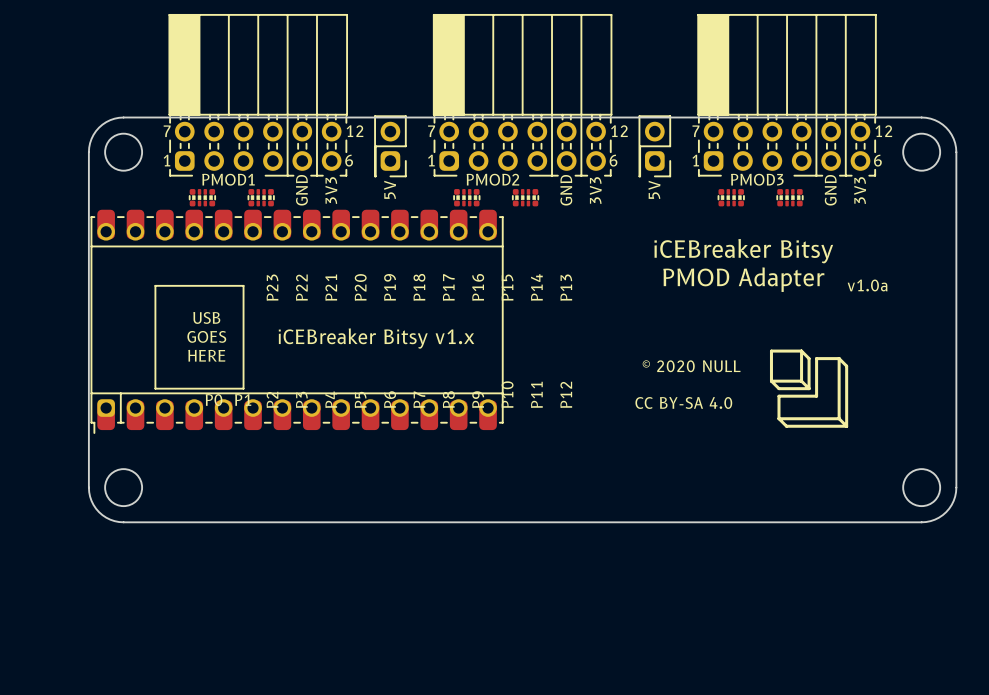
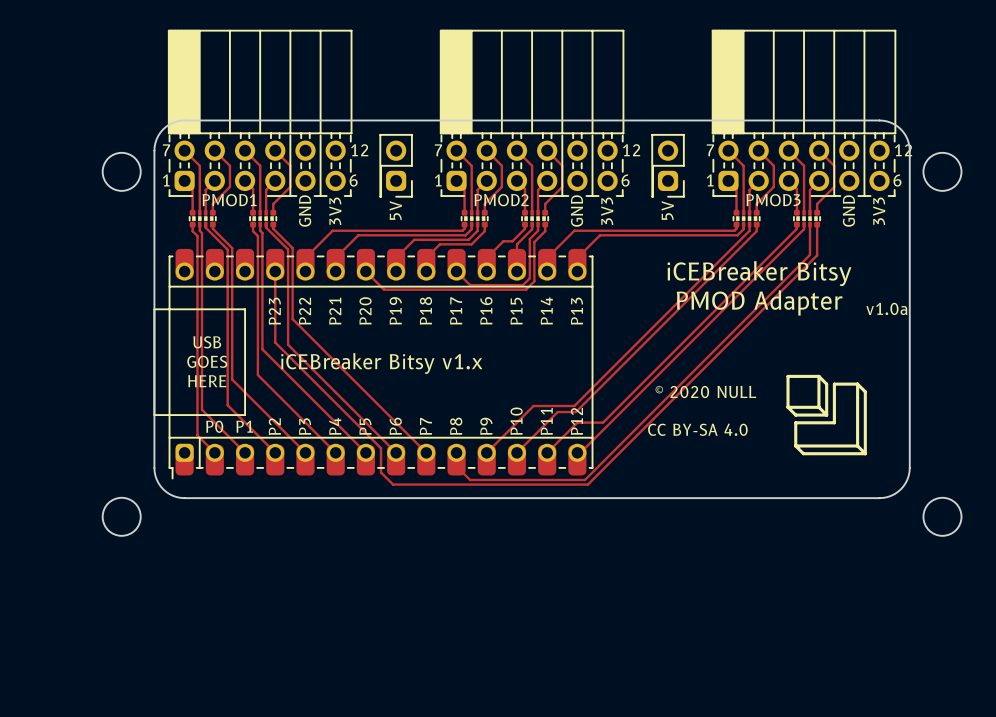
board edge: (123, 117) (921, 117) (934, 120) (949, 131) (955, 143) (956, 152) (956, 487) (953, 500) (942, 515) (930, 521) (921, 522) (123, 522) (110, 519) (96, 508) (90, 496) (88, 487) (88, 152) (91, 138) (99, 127) (110, 120) (123, 117) -> (184, 120) (173, 122) (163, 129) (156, 139) (154, 150) (154, 467) (158, 483) (169, 494) (184, 498) (879, 498) (894, 494) (905, 483) (909, 467) (909, 150) (905, 135) (894, 124) (879, 120) (184, 120)
track: none -> (184, 150) (199, 165) (199, 212)
track: none -> (214, 150) (229, 165) (229, 186) (212, 204) (212, 212)
track: none -> (245, 150) (260, 165) (260, 212)
track: none -> (275, 150) (290, 165) (290, 186) (273, 204) (273, 212)
track: none -> (456, 150) (471, 165) (471, 212)
track: none -> (486, 150) (501, 165) (501, 186) (484, 204) (484, 212)
track: none -> (516, 150) (532, 165) (532, 212)
track: none -> (547, 150) (562, 165) (562, 186) (545, 204) (545, 212)
track: none -> (728, 150) (743, 165) (743, 212)
track: none -> (758, 150) (773, 165) (773, 186) (756, 204) (756, 212)
track: none -> (788, 150) (804, 165) (804, 212)
track: none -> (819, 150) (834, 165) (834, 186) (817, 204) (817, 212)
track: none -> (184, 180) (192, 188) (192, 212)
track: none -> (214, 180) (205, 190) (205, 212)
track: none -> (245, 180) (253, 188) (253, 212)
track: none -> (275, 180) (266, 190) (266, 212)
track: none -> (456, 180) (464, 188) (464, 212)
track: none -> (486, 180) (477, 190) (477, 212)
track: none -> (516, 180) (525, 188) (525, 212)
track: none -> (547, 180) (538, 190) (538, 212)
track: none -> (728, 180) (736, 188) (736, 212)
track: none -> (758, 180) (749, 190) (749, 212)
track: none -> (788, 180) (796, 188) (796, 212)
track: none -> (819, 180) (810, 190) (810, 212)
track: none -> (192, 224) (192, 231) (197, 236) (197, 435) (214, 452)
track: none -> (199, 224) (199, 230) (202, 233) (202, 409) (245, 452)
track: none -> (205, 224) (205, 227) (227, 249) (227, 405) (275, 452)
track: none -> (212, 224) (212, 228) (232, 248) (232, 379) (305, 452)
track: none -> (253, 224) (253, 231) (257, 236) (257, 375) (335, 452)
track: none -> (260, 224) (260, 230) (262, 233) (262, 349) (365, 452)
track: none -> (266, 224) (266, 227) (288, 249) (288, 344) (396, 452)
track: none -> (273, 224) (273, 228) (292, 248) (292, 319) (426, 452)
track: none -> (464, 224) (462, 230) (332, 230) (305, 257) (305, 263)
track: none -> (471, 224) (471, 229) (465, 235) (358, 235) (335, 257) (335, 263)
track: none -> (477, 224) (477, 230) (468, 239) (414, 239) (396, 257) (396, 263)
track: none -> (484, 224) (484, 231) (471, 244) (439, 244) (426, 257) (426, 263)
track: none -> (525, 224) (525, 228) (512, 241) (503, 241) (486, 257) (486, 263)
track: none -> (532, 224) (532, 229) (516, 244) (516, 263)
track: none -> (538, 224) (538, 230) (529, 239) (529, 278) (523, 285) (470, 285) (456, 271)
track: none -> (545, 224) (545, 231) (534, 242) (534, 281) (526, 289) (384, 289) (365, 271)
track: none -> (736, 224) (734, 230) (574, 230) (547, 257) (547, 263)
track: none -> (743, 224) (743, 229) (737, 235) (600, 235) (577, 257) (577, 263)
track: none -> (749, 224) (749, 230) (574, 405) (533, 405) (486, 452)
track: none -> (756, 224) (756, 231) (575, 412) (557, 412) (516, 452)
track: none -> (796, 224) (796, 228) (603, 422) (577, 422) (547, 452)
track: none -> (804, 224) (804, 229) (580, 452) (577, 452)
track: none -> (810, 224) (810, 254) (584, 480) (470, 480) (456, 466) (456, 460)
track: none -> (817, 224) (817, 255) (587, 484) (393, 484) (381, 472) (381, 448) (275, 342) (275, 271)
part position: (297, 321) -> (381, 364)

